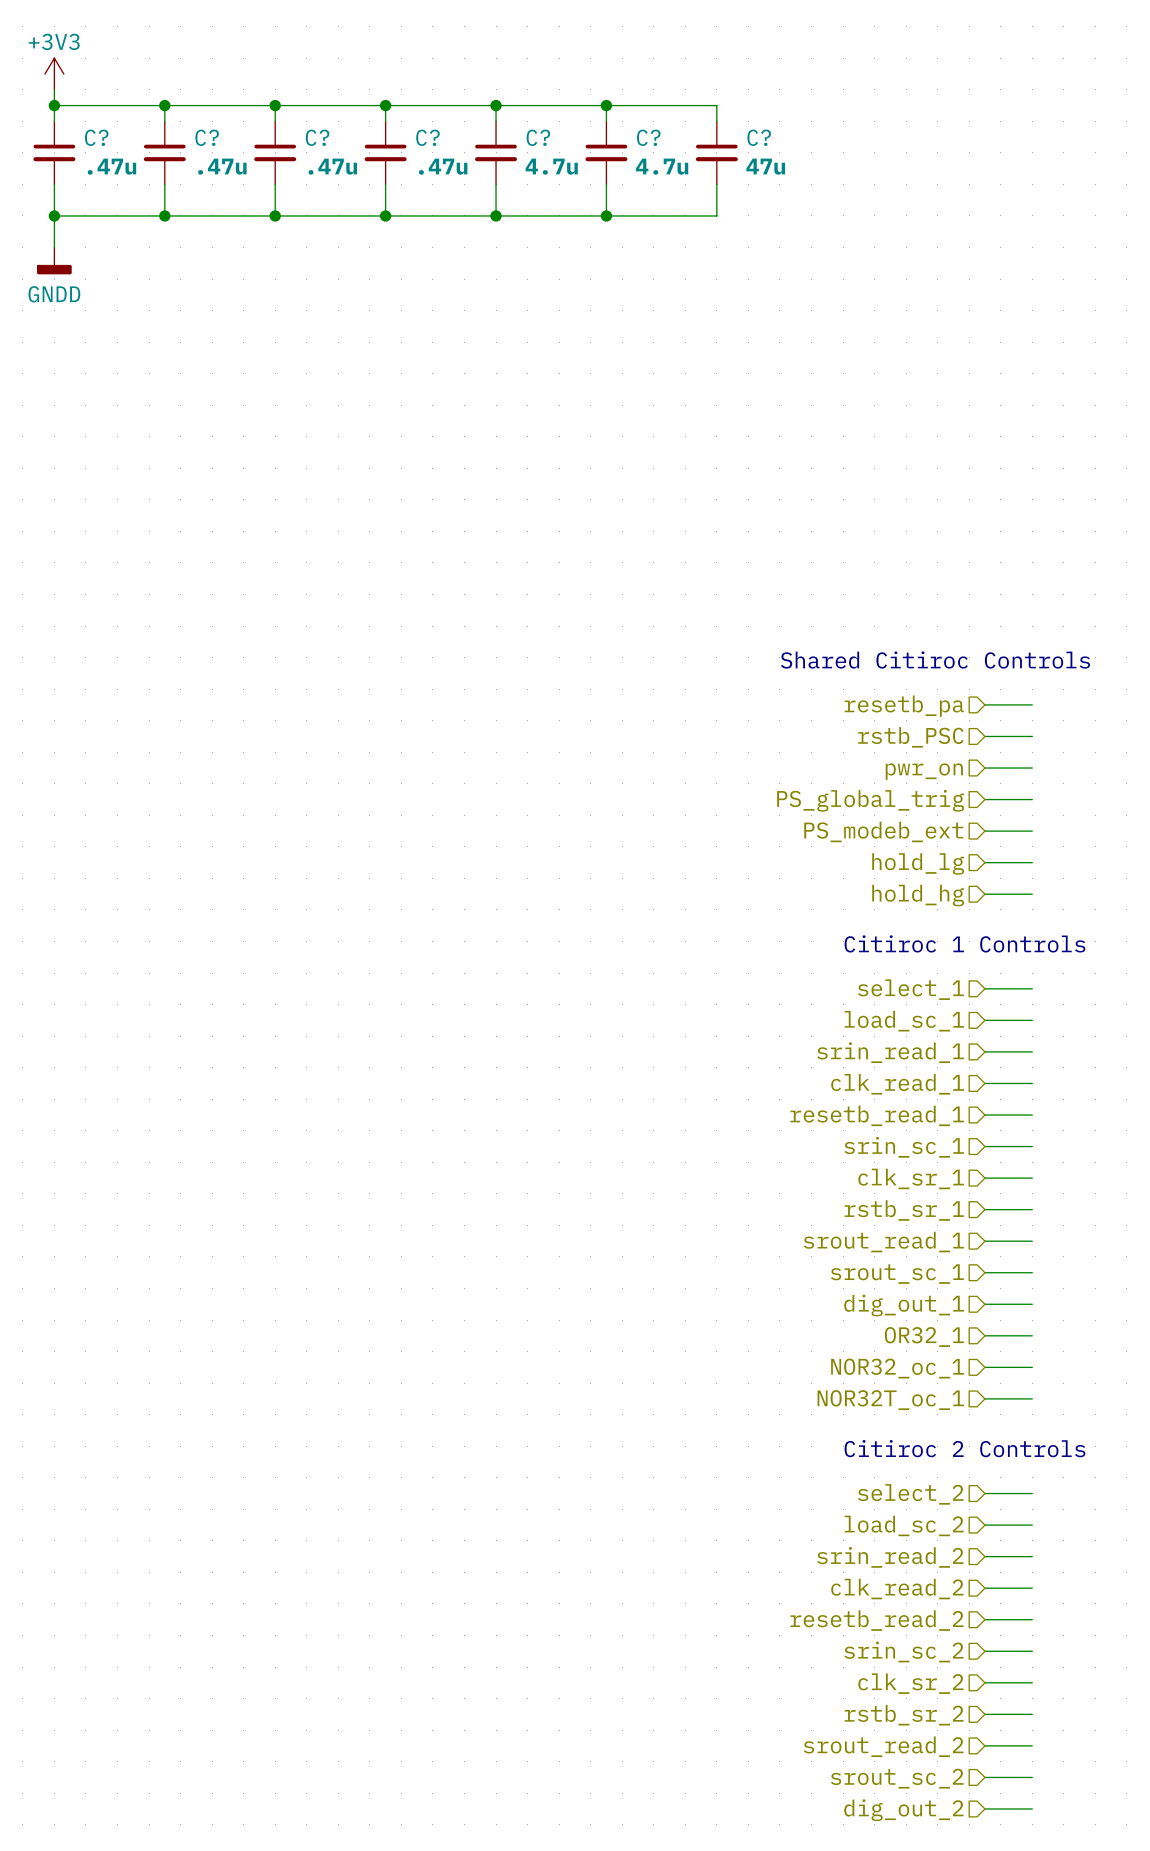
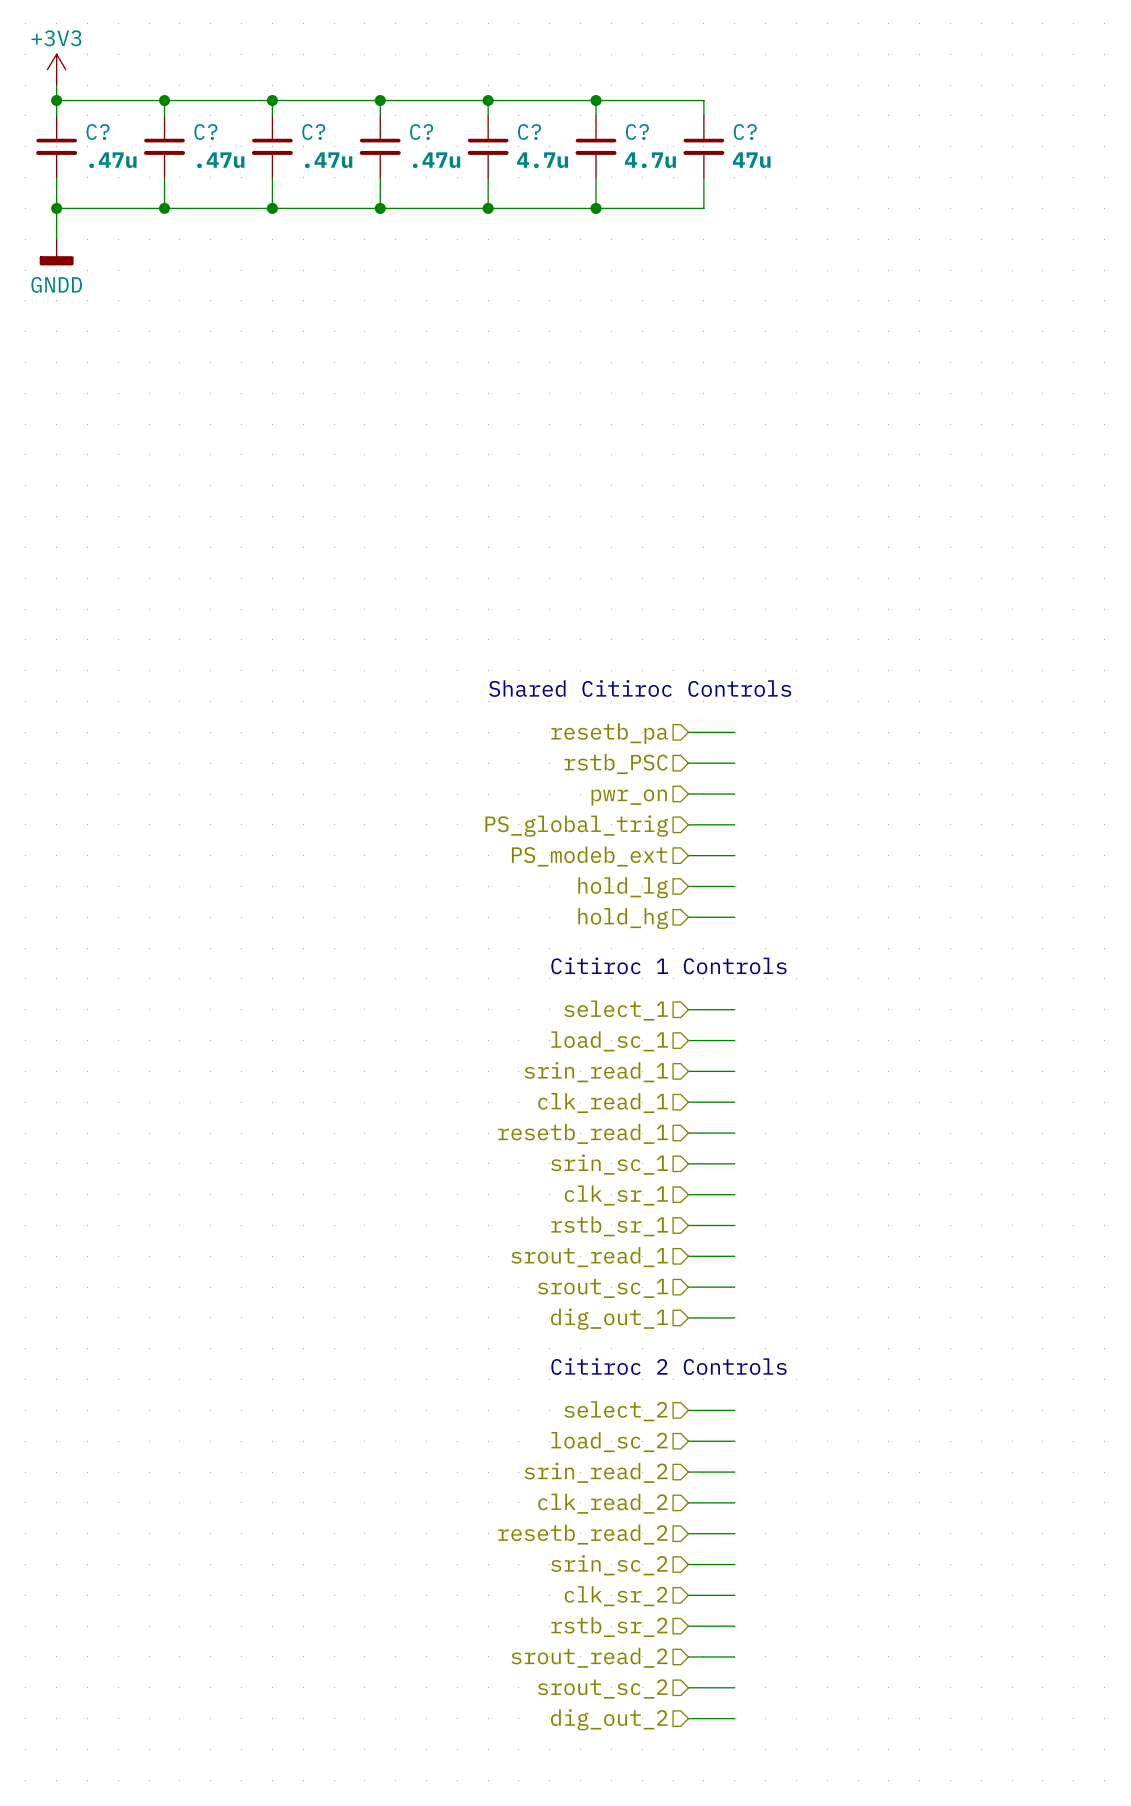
text position: Shared Citiroc Controls (935, 660) -> Shared Citiroc Controls (640, 688)
wire: (984, 704) (1032, 704) -> (688, 732) (734, 732)
hierarchical label position: resetb_pa (904, 706) -> resetb_pa (609, 733)
wire: (984, 736) (1032, 736) -> (688, 763) (734, 763)
hierarchical label position: rstb_PSC (910, 737) -> rstb_PSC (616, 764)
wire: (984, 768) (1032, 768) -> (688, 794) (734, 794)
hierarchical label position: pwr_on (924, 771) -> pwr_on (629, 797)
wire: (984, 799) (1032, 799) -> (688, 824) (734, 824)
hierarchical label position: PS_global_trig (870, 800) -> PS_global_trig (576, 826)
hierarchical label position: PS_modeb_ext (883, 831) -> PS_modeb_ext (589, 856)
wire: (984, 831) (1032, 831) -> (688, 855) (734, 855)
wire: (984, 862) (1032, 862) -> (688, 886) (734, 886)
hierarchical label position: hold_lg (918, 863) -> hold_lg (623, 887)
wire: (984, 894) (1032, 894) -> (688, 917) (734, 917)
hierarchical label position: hold_hg (918, 895) -> hold_hg (623, 918)
text position: Citiroc 1 Controls (964, 943) -> Citiroc 1 Controls (668, 965)
wire: (984, 988) (1032, 988) -> (688, 1009) (734, 1009)
hierarchical label position: select_1 (910, 989) -> select_1 (616, 1010)
wire: (984, 1020) (1032, 1020) -> (688, 1040) (734, 1040)
hierarchical label position: load_sc_1 (904, 1021) -> load_sc_1 (609, 1041)
wire: (984, 1051) (1032, 1051) -> (688, 1071) (734, 1071)
hierarchical label position: srin_read_1 (890, 1052) -> srin_read_1 (596, 1072)
wire: (984, 1083) (1032, 1083) -> (688, 1102) (734, 1102)
hierarchical label position: clk_read_1 (897, 1084) -> clk_read_1 (603, 1103)
hierarchical label position: resetb_read_1 (877, 1115) -> resetb_read_1 (583, 1133)
wire: (984, 1115) (1032, 1115) -> (688, 1133) (734, 1133)
wire: (984, 1146) (1032, 1146) -> (688, 1163) (734, 1163)
hierarchical label position: srin_sc_1 (904, 1147) -> srin_sc_1 (609, 1164)
hierarchical label position: clk_sr_1 (911, 1178) -> clk_sr_1 (616, 1195)
wire: (984, 1178) (1032, 1178) -> (688, 1194) (734, 1194)
wire: (984, 1209) (1032, 1209) -> (688, 1225) (734, 1225)
hierarchical label position: rstb_sr_1 (904, 1210) -> rstb_sr_1 (609, 1226)
wire: (984, 1241) (1032, 1241) -> (688, 1256) (734, 1256)
hierarchical label position: srout_read_1 (883, 1242) -> srout_read_1 (589, 1257)
wire: (984, 1272) (1032, 1272) -> (688, 1287) (734, 1287)
hierarchical label position: srout_sc_1 (897, 1274) -> srout_sc_1 (602, 1288)
wire: (984, 1304) (1032, 1304) -> (688, 1317) (734, 1317)
hierarchical label position: dig_out_1 (904, 1305) -> dig_out_1 (609, 1319)
wire: (984, 1335) (1032, 1335) -> none
hierarchical label: OR32_1 (924, 1337) -> none
wire: (984, 1367) (1032, 1367) -> none
hierarchical label: NOR32_oc_1 (897, 1368) -> none
wire: (984, 1398) (1032, 1398) -> (688, 1410) (734, 1410)
hierarchical label: NOR32T_oc_1 (890, 1400) -> none
text position: Citiroc 2 Controls (964, 1448) -> Citiroc 2 Controls (668, 1366)
wire: (984, 1493) (1032, 1493) -> (688, 1502) (734, 1502)
hierarchical label position: select_2 (910, 1494) -> select_2 (615, 1411)
hierarchical label position: load_sc_2 (904, 1525) -> load_sc_2 (609, 1442)
wire: (984, 1525) (1032, 1525) -> (688, 1441) (734, 1441)
wire: (984, 1556) (1032, 1556) -> (688, 1472) (734, 1472)
hierarchical label position: srin_read_2 (890, 1557) -> srin_read_2 (596, 1472)
wire: (984, 1588) (1032, 1588) -> (688, 1595) (734, 1595)
hierarchical label position: clk_read_2 (897, 1589) -> clk_read_2 (602, 1503)
wire: (984, 1619) (1032, 1619) -> (688, 1533) (734, 1533)
hierarchical label position: resetb_read_2 (876, 1620) -> resetb_read_2 (582, 1534)
wire: (984, 1651) (1032, 1651) -> (688, 1564) (734, 1564)
hierarchical label position: srin_sc_2 (903, 1652) -> srin_sc_2 (609, 1565)
wire: (984, 1682) (1032, 1682) -> none
hierarchical label position: clk_sr_2 (910, 1683) -> clk_sr_2 (616, 1596)
wire: (984, 1714) (1032, 1714) -> (688, 1626) (734, 1626)
hierarchical label position: rstb_sr_2 (904, 1715) -> rstb_sr_2 (609, 1626)
wire: (984, 1745) (1032, 1745) -> (688, 1656) (734, 1656)
hierarchical label position: srout_read_2 (883, 1746) -> srout_read_2 (589, 1657)
wire: (984, 1777) (1032, 1777) -> (688, 1687) (734, 1687)
hierarchical label position: srout_sc_2 (897, 1778) -> srout_sc_2 (602, 1688)
wire: (984, 1808) (1032, 1808) -> (688, 1718) (734, 1718)
hierarchical label position: dig_out_2 (903, 1810) -> dig_out_2 (609, 1719)

